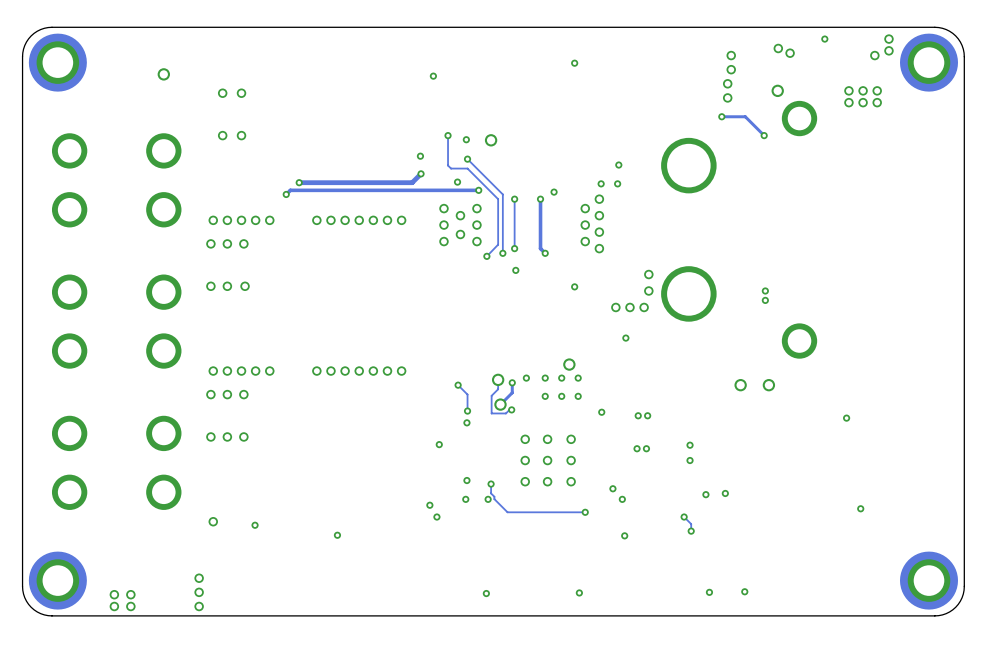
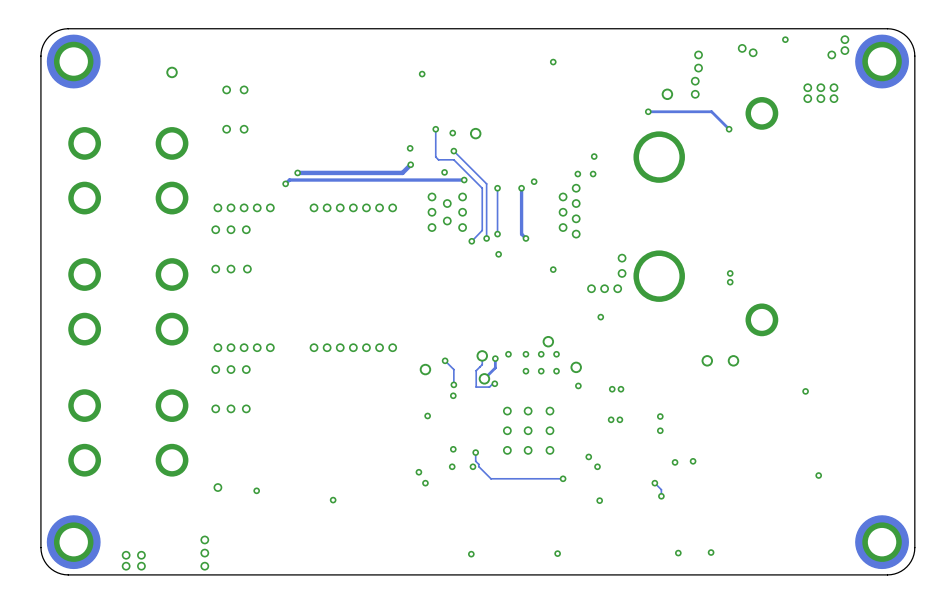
part position: (777, 90) -> (667, 94)
track: none -> (689, 111) (648, 111)
via position: (721, 116) -> (648, 111)
part: none -> (576, 367)
part: none -> (425, 369)

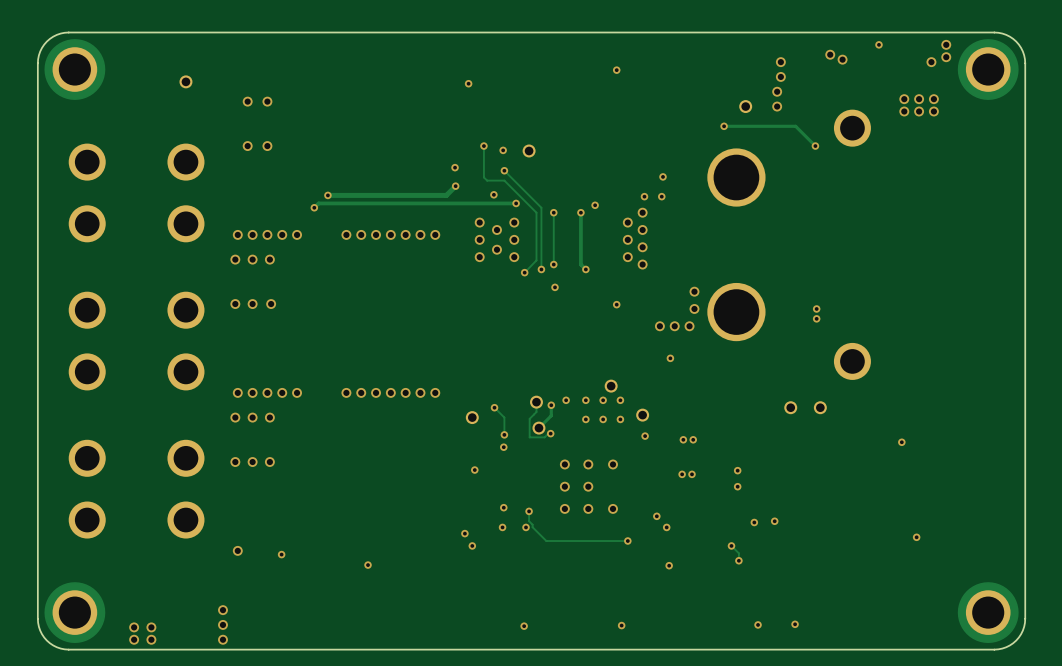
via: (549, 430) -> none

